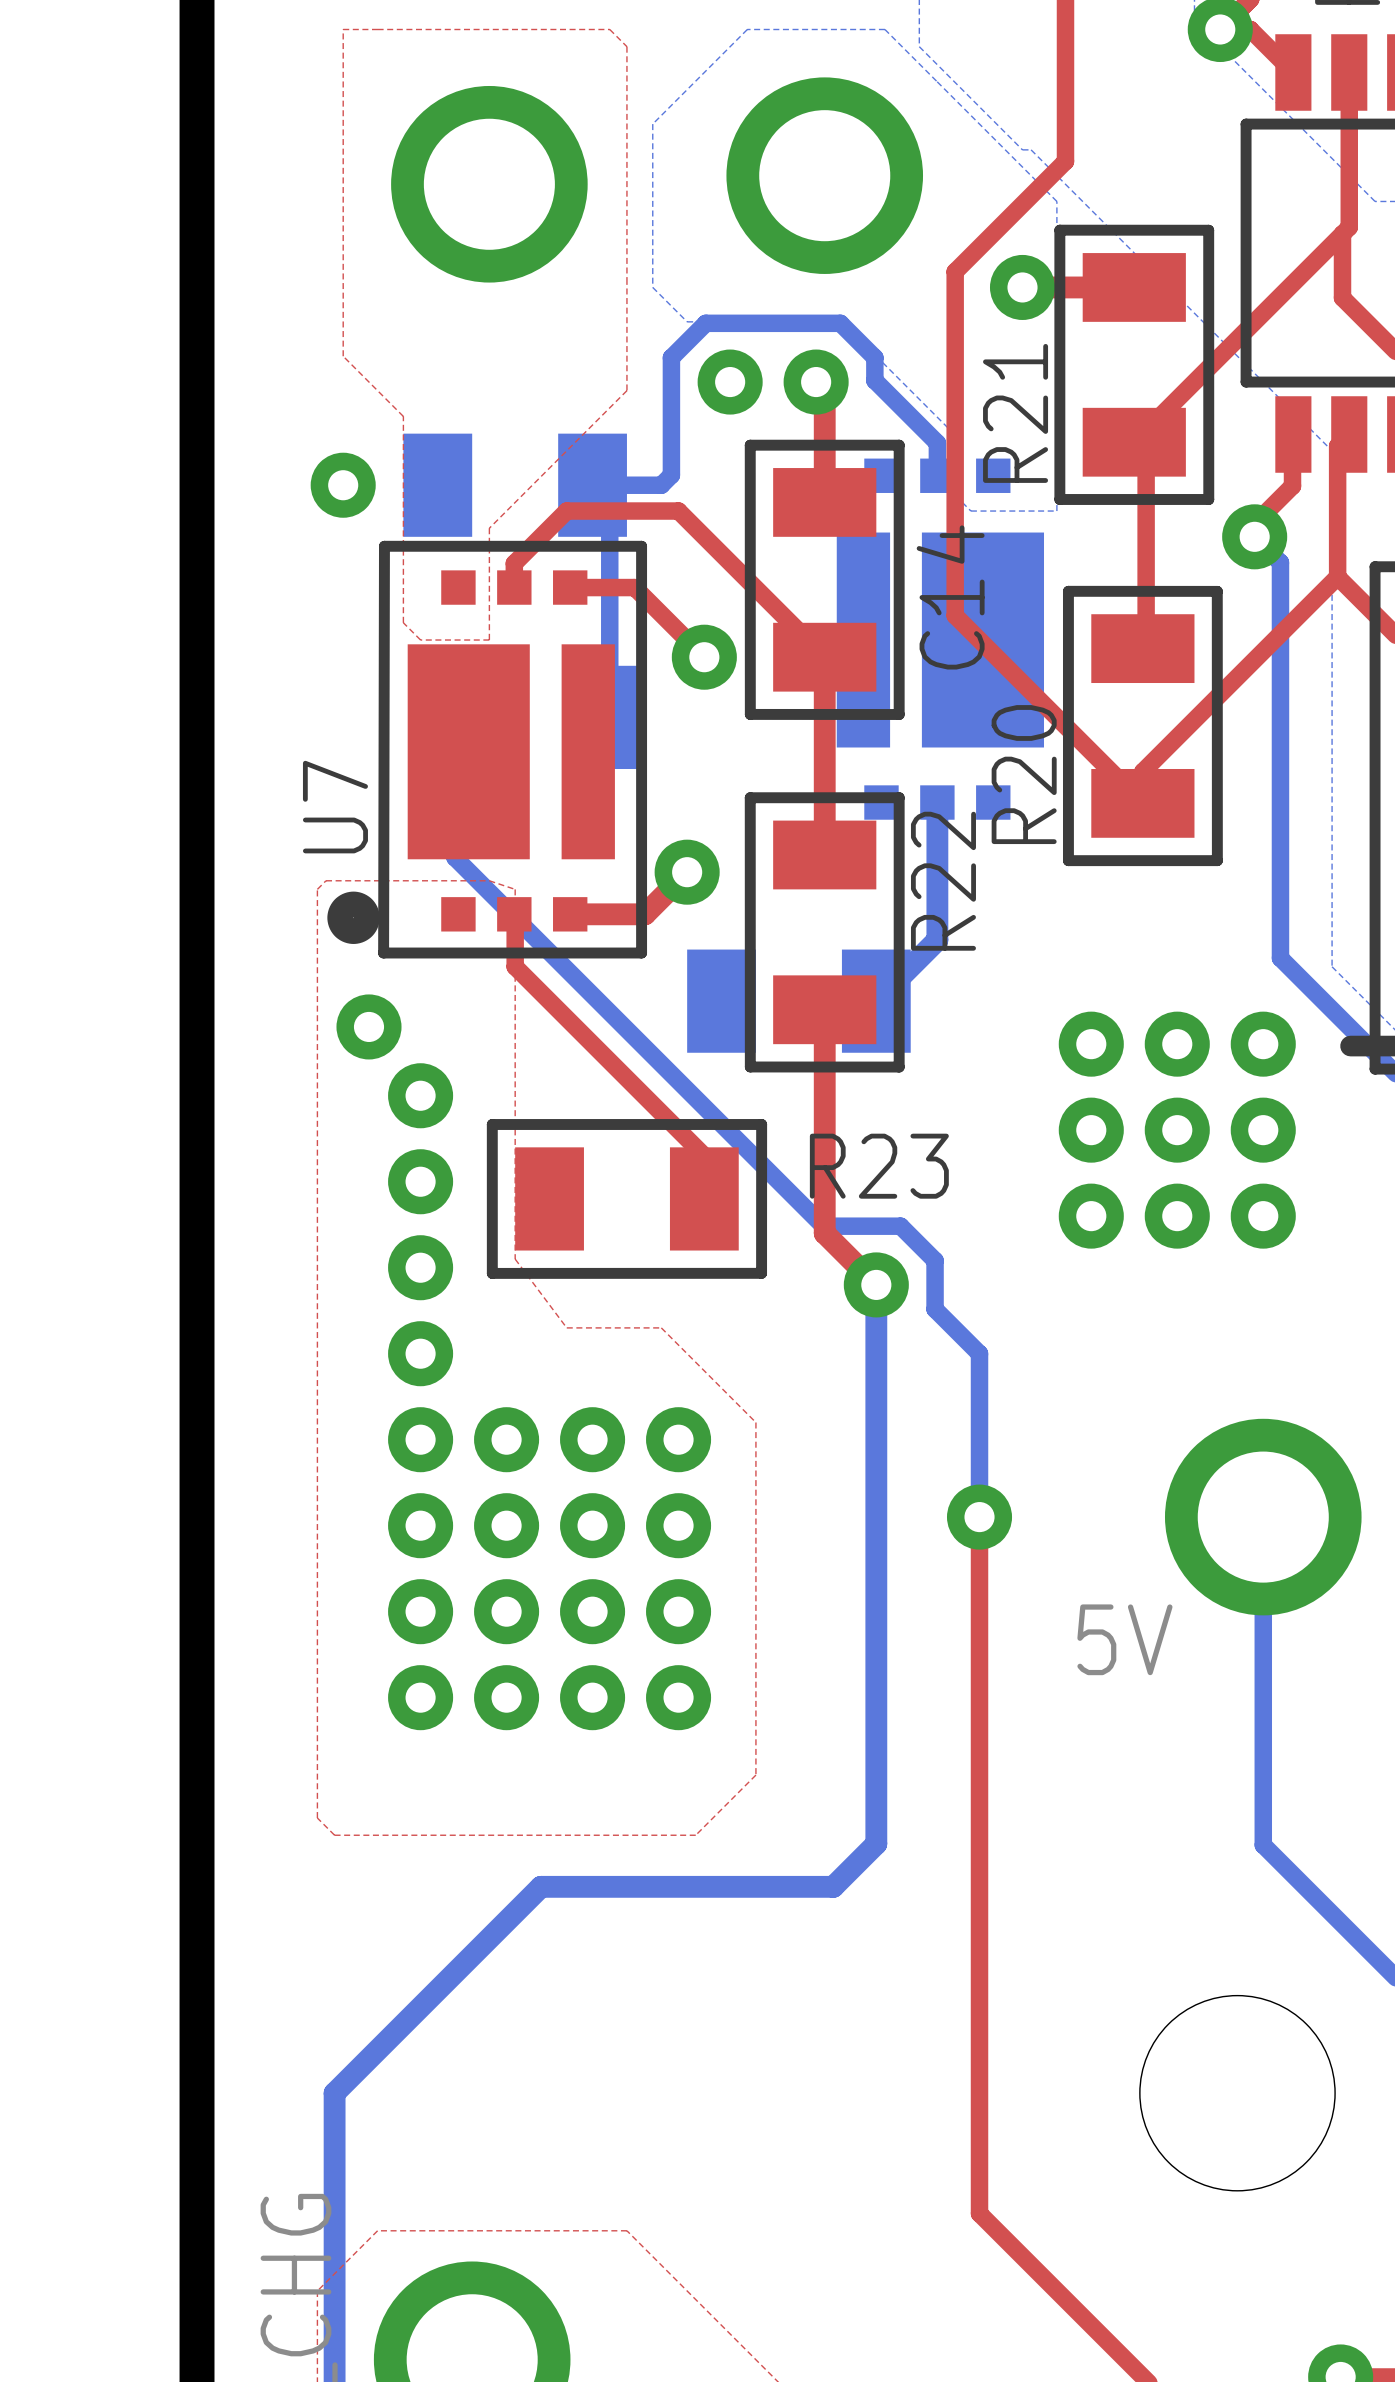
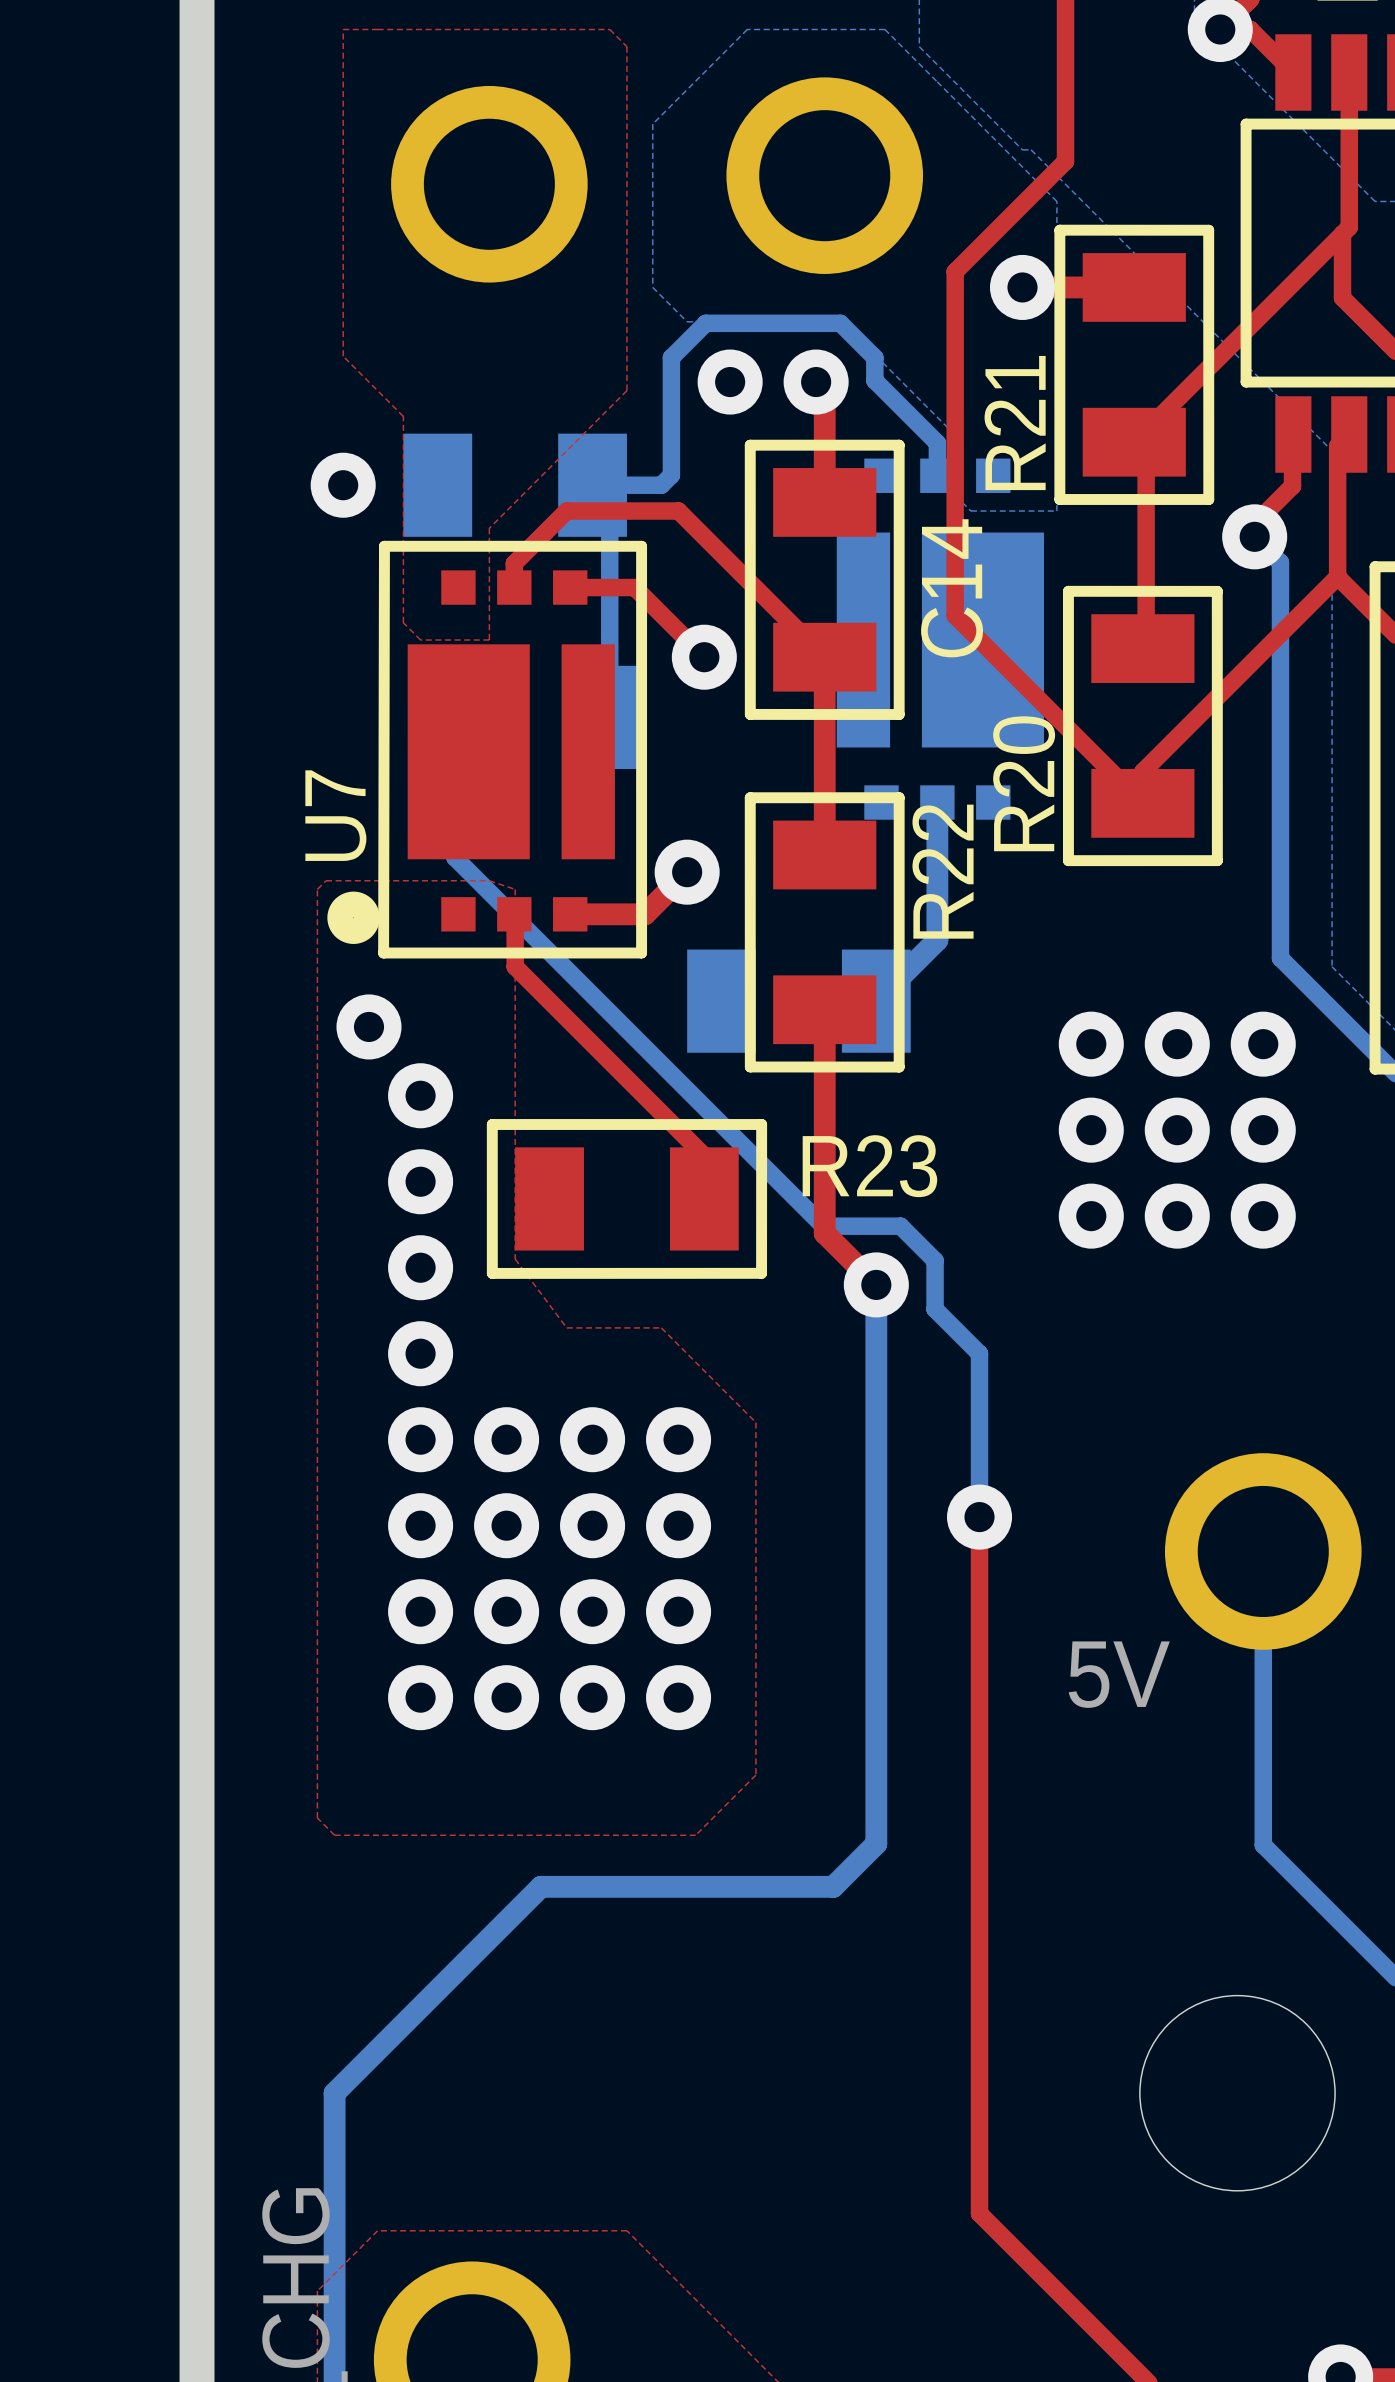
part position: (1263, 1517) -> (1263, 1551)

